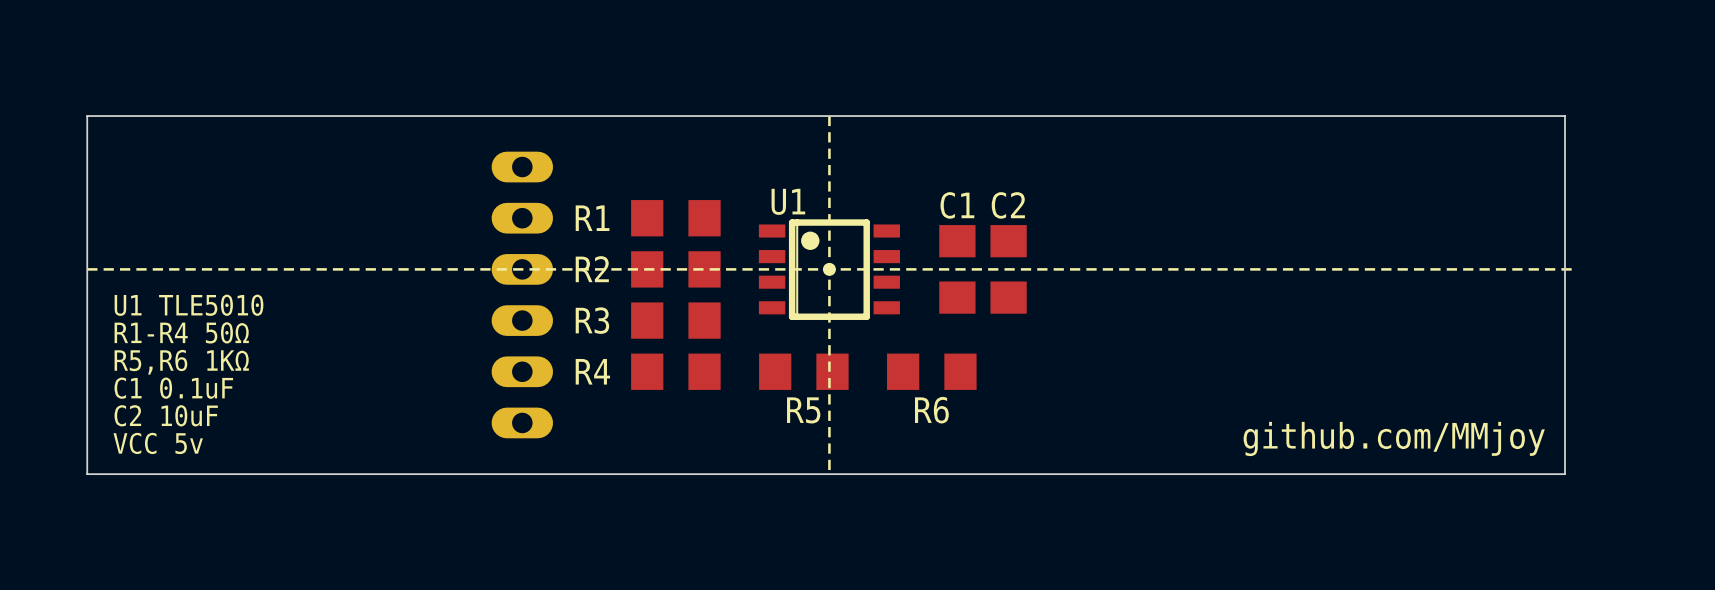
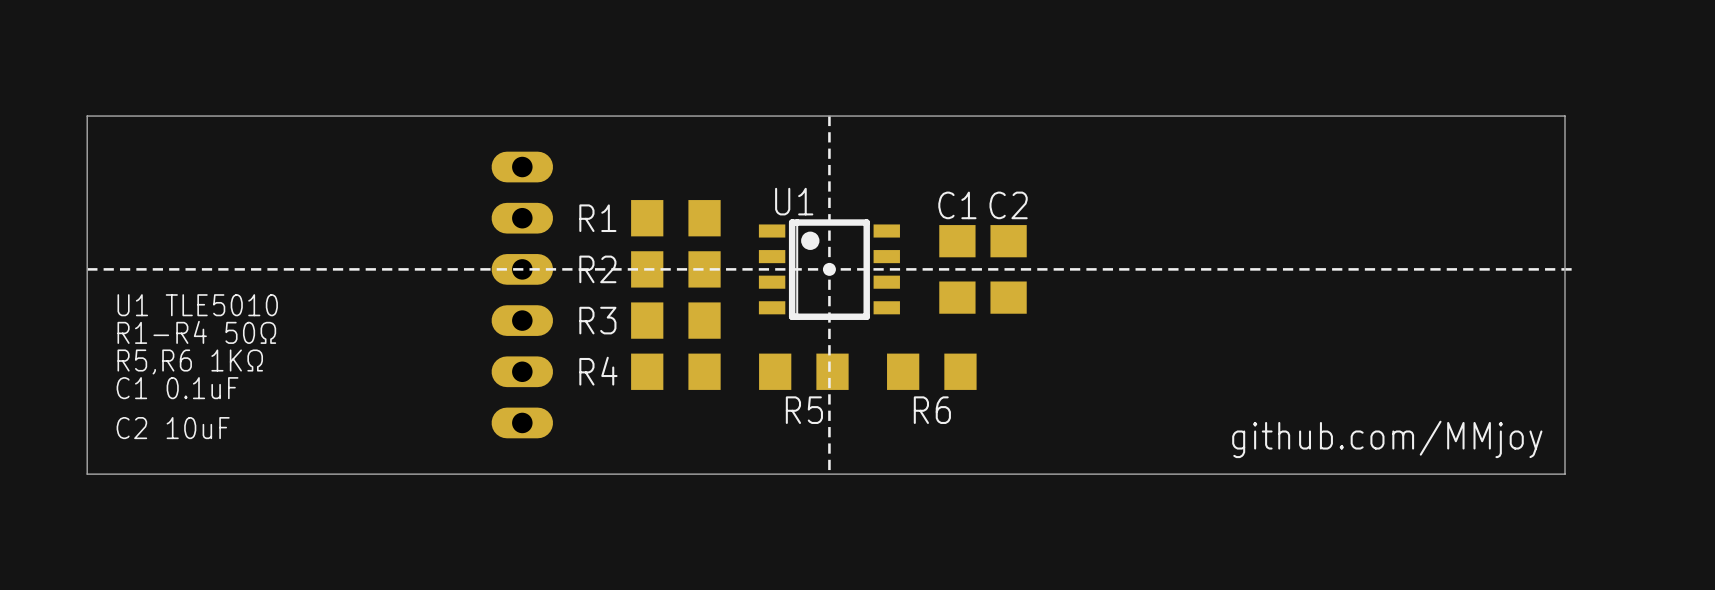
text position: C2 10uF (166, 415) -> C2 10uF (173, 428)
text: VCC 5v (158, 443) -> none

